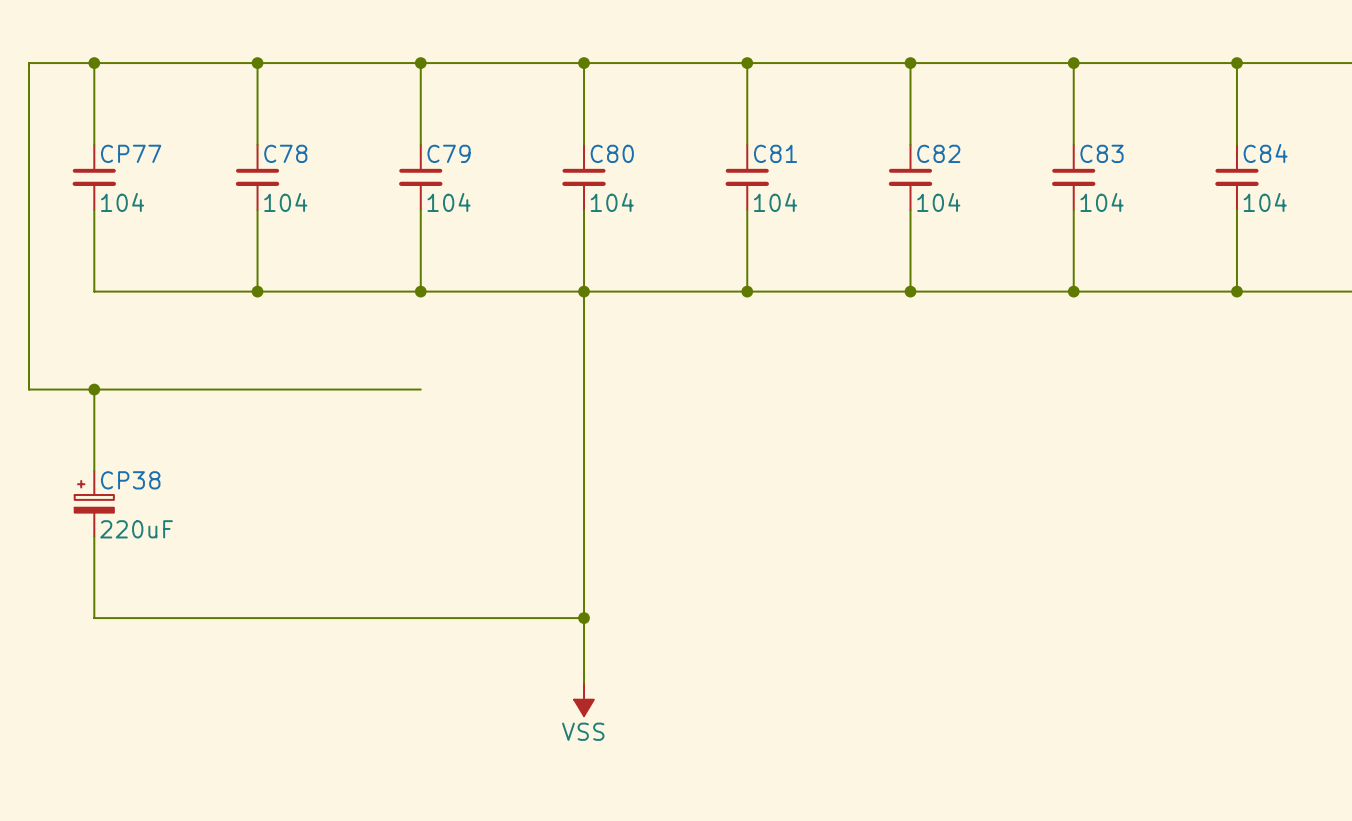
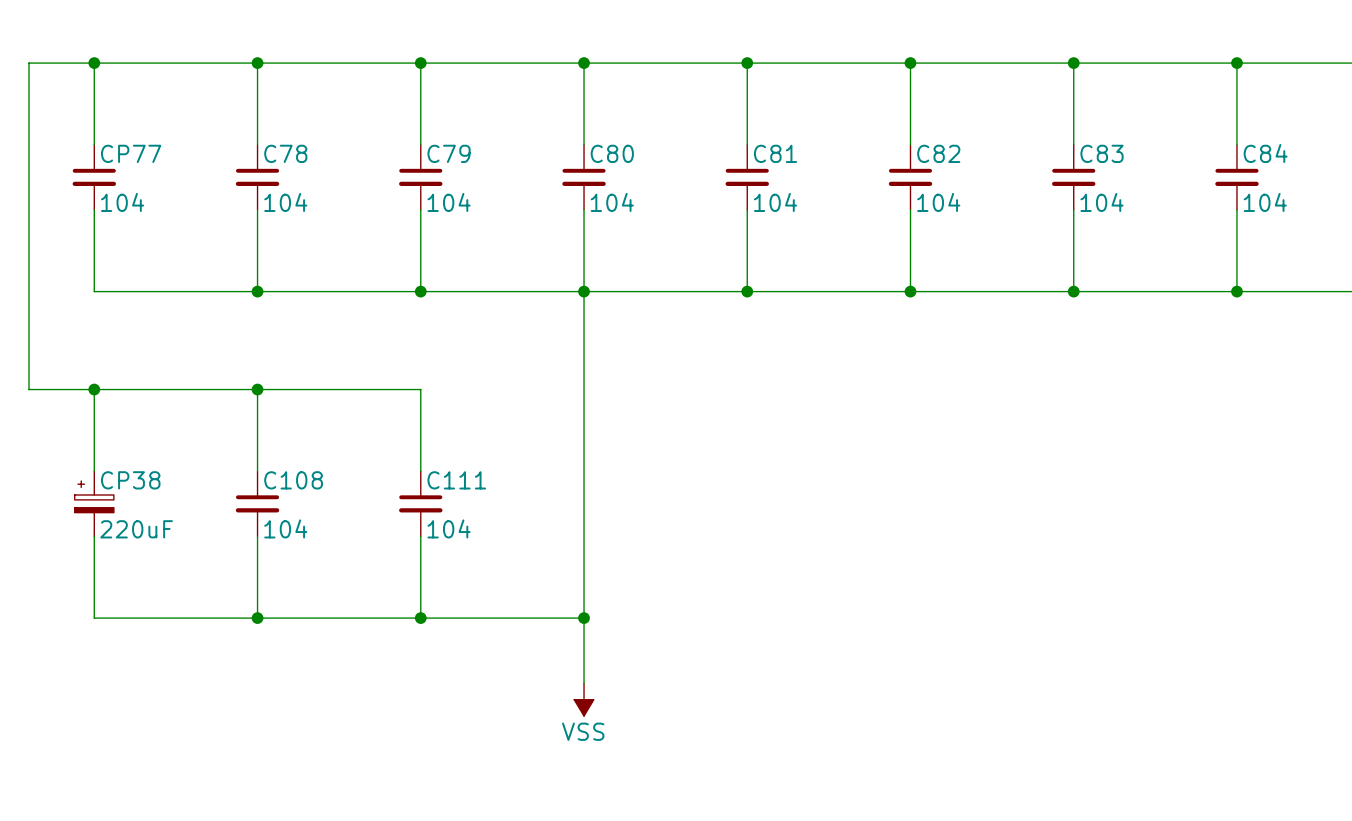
wire: none -> (257, 389) (257, 471)
junction: none -> (257, 389)
wire: none -> (420, 389) (420, 471)
C108: none -> 104 (257, 503)
C111: none -> 104 (420, 503)
wire: none -> (257, 536) (257, 618)
wire: none -> (420, 536) (420, 618)
junction: none -> (257, 618)
junction: none -> (420, 618)

